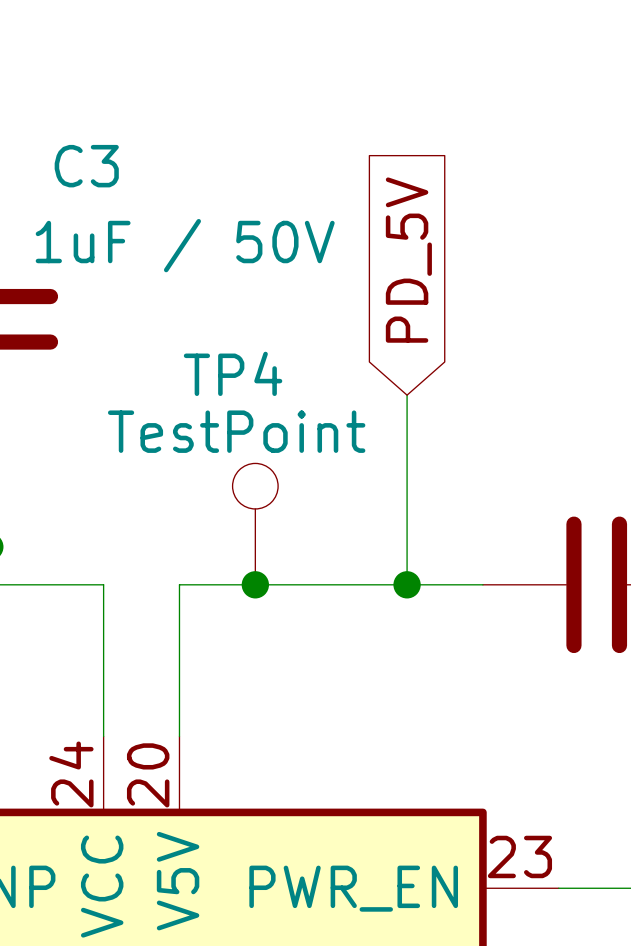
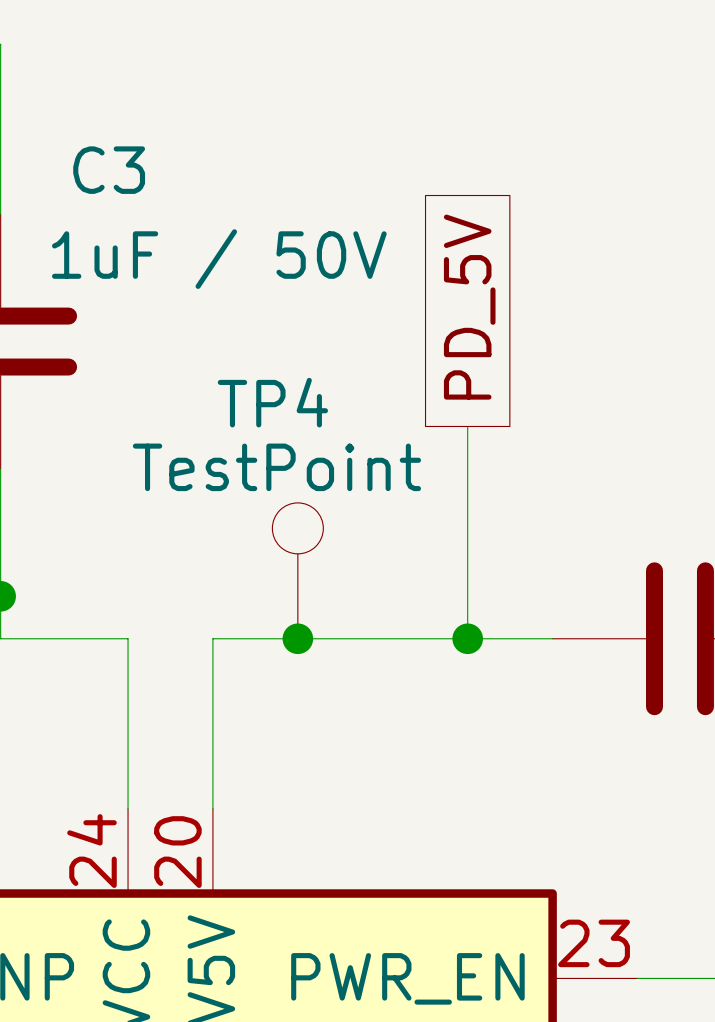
global label shape: input (408, 260) -> passive (469, 307)

